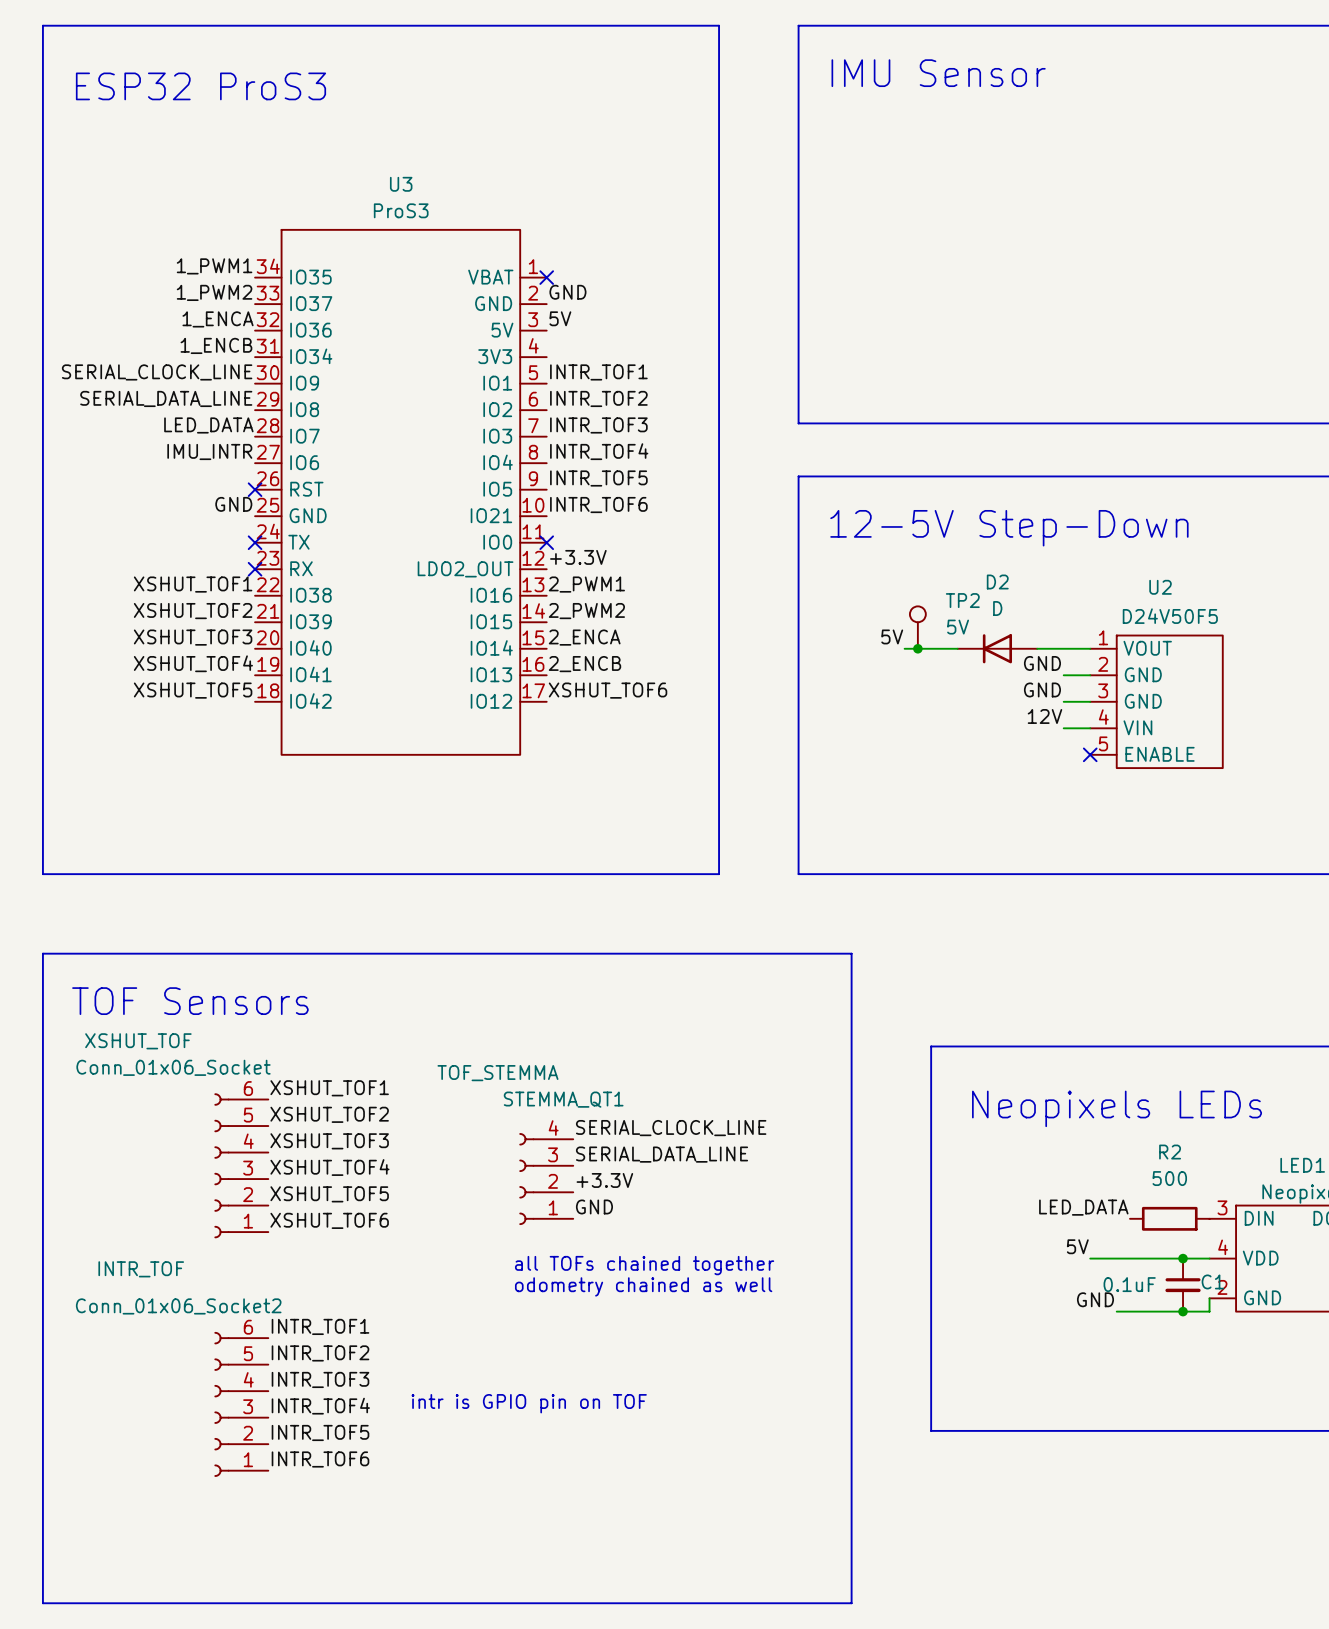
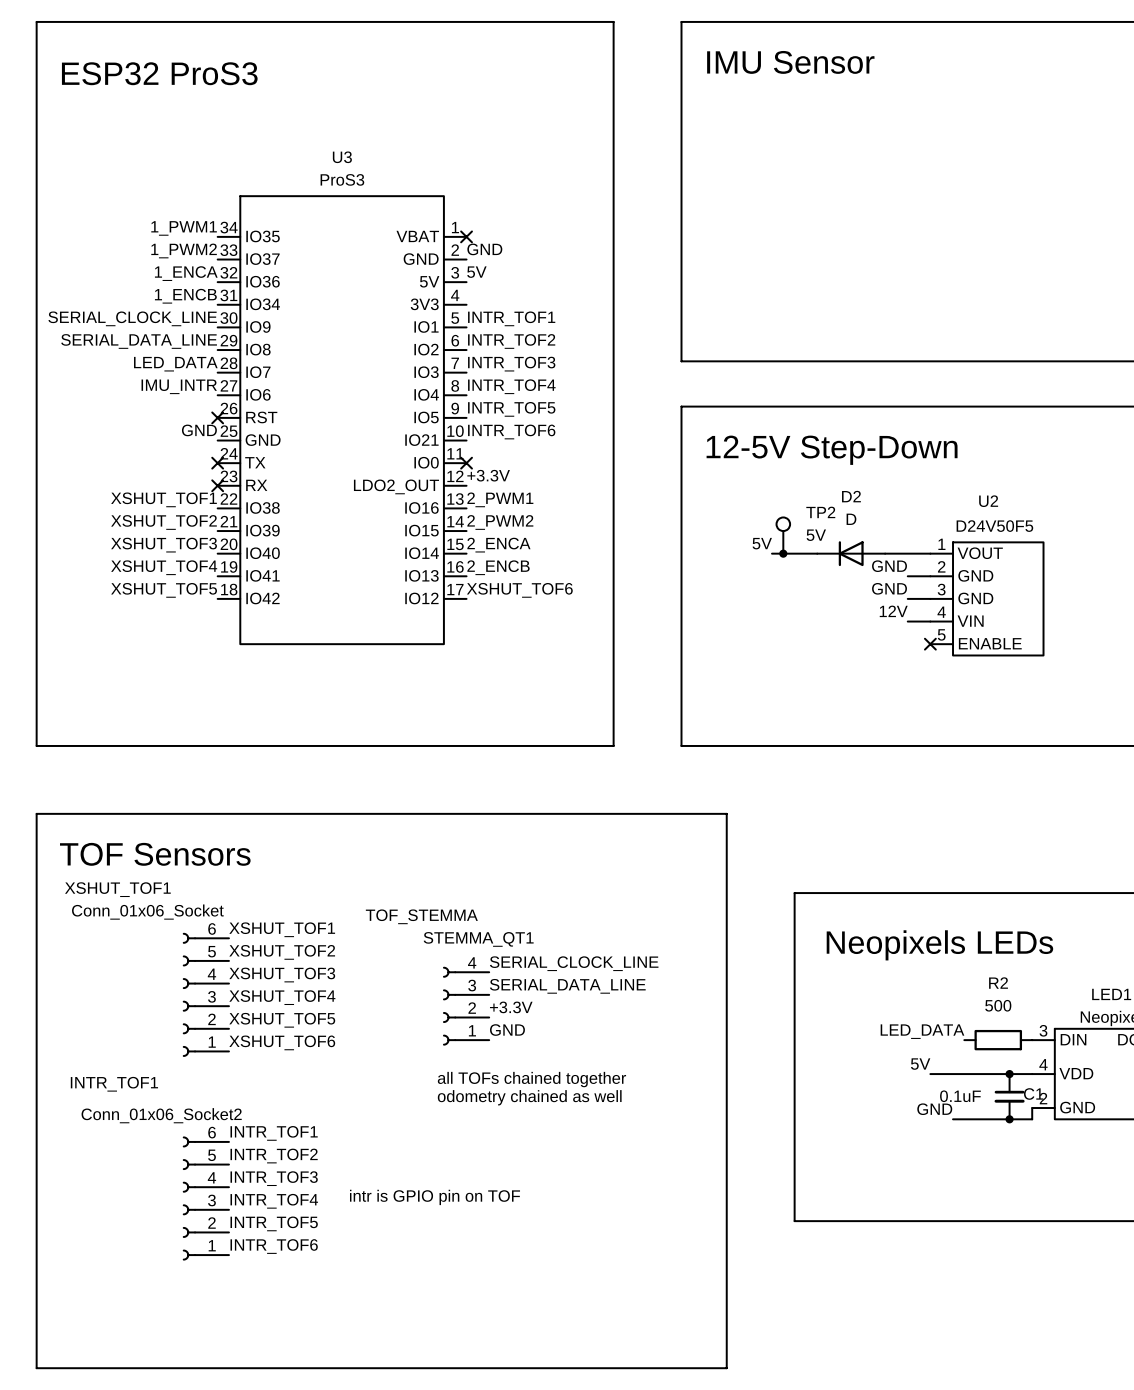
XSHUT_TOF name: XSHUT_TOF (138, 1041) -> XSHUT_TOF1 (117, 889)
INTR_TOF name: INTR_TOF (141, 1269) -> INTR_TOF1 (114, 1084)

